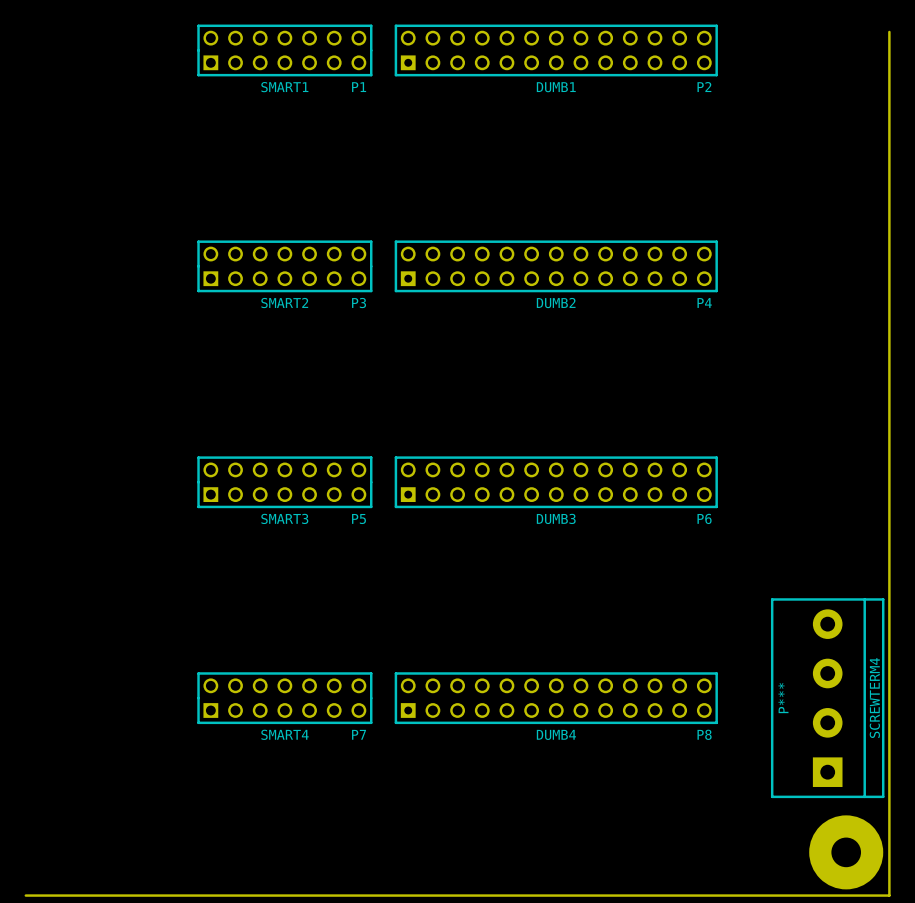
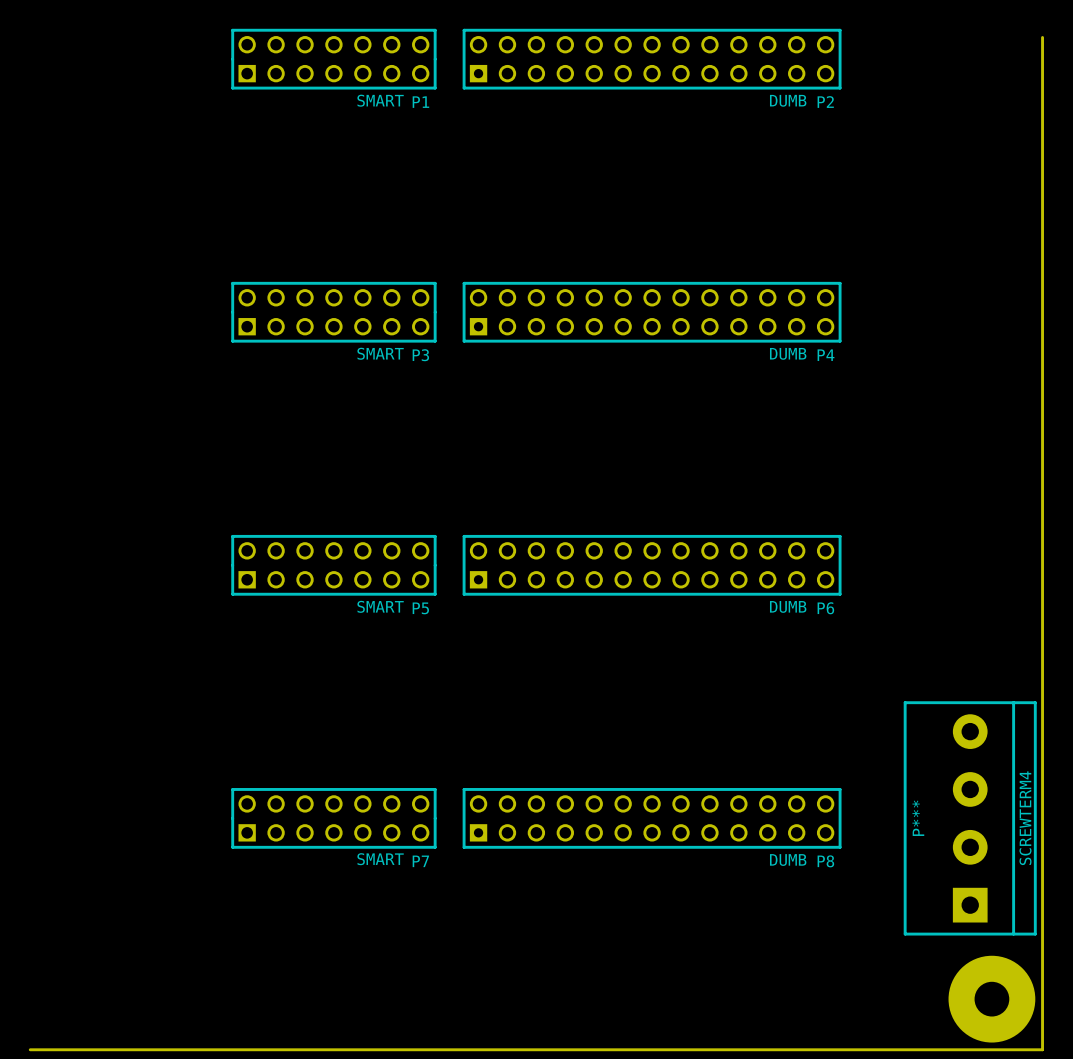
P1 value: SMART1 (284, 87) -> SMART (380, 100)
P2 value: DUMB1 (556, 87) -> DUMB (788, 100)
P3 value: SMART2 (284, 303) -> SMART (380, 353)
P4 value: DUMB2 (556, 303) -> DUMB (788, 353)
P5 value: SMART3 (284, 518) -> SMART (380, 606)
P6 value: DUMB3 (556, 518) -> DUMB (788, 606)
P7 value: SMART4 (285, 734) -> SMART (380, 859)
P8 value: DUMB4 (556, 734) -> DUMB (788, 860)

